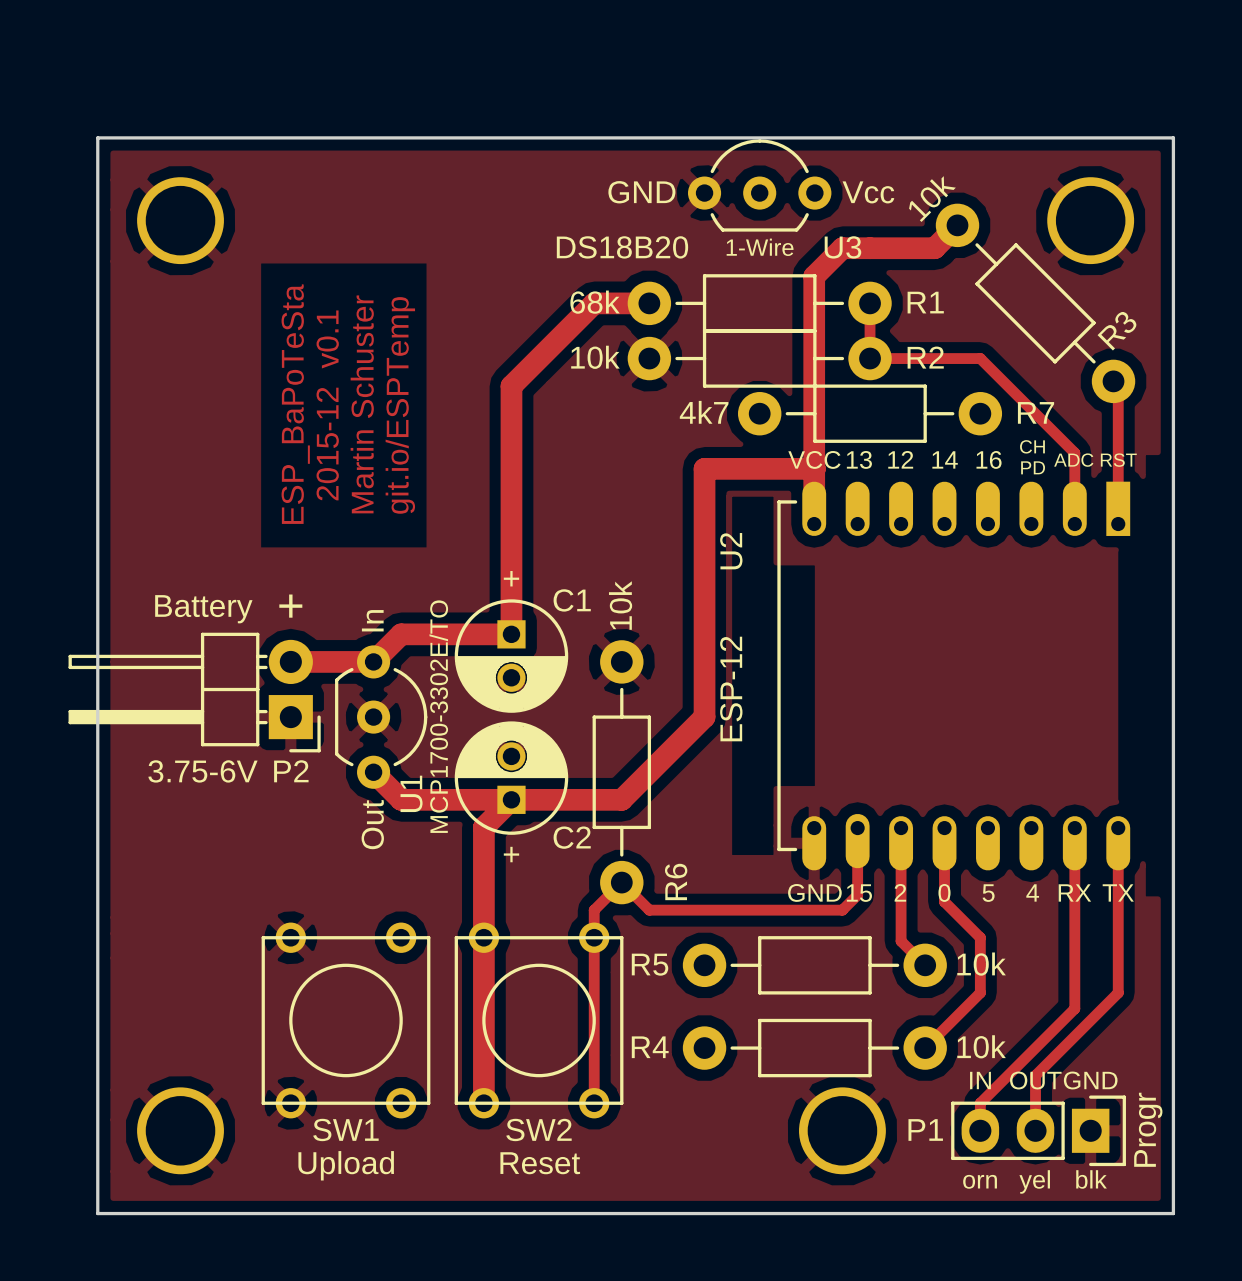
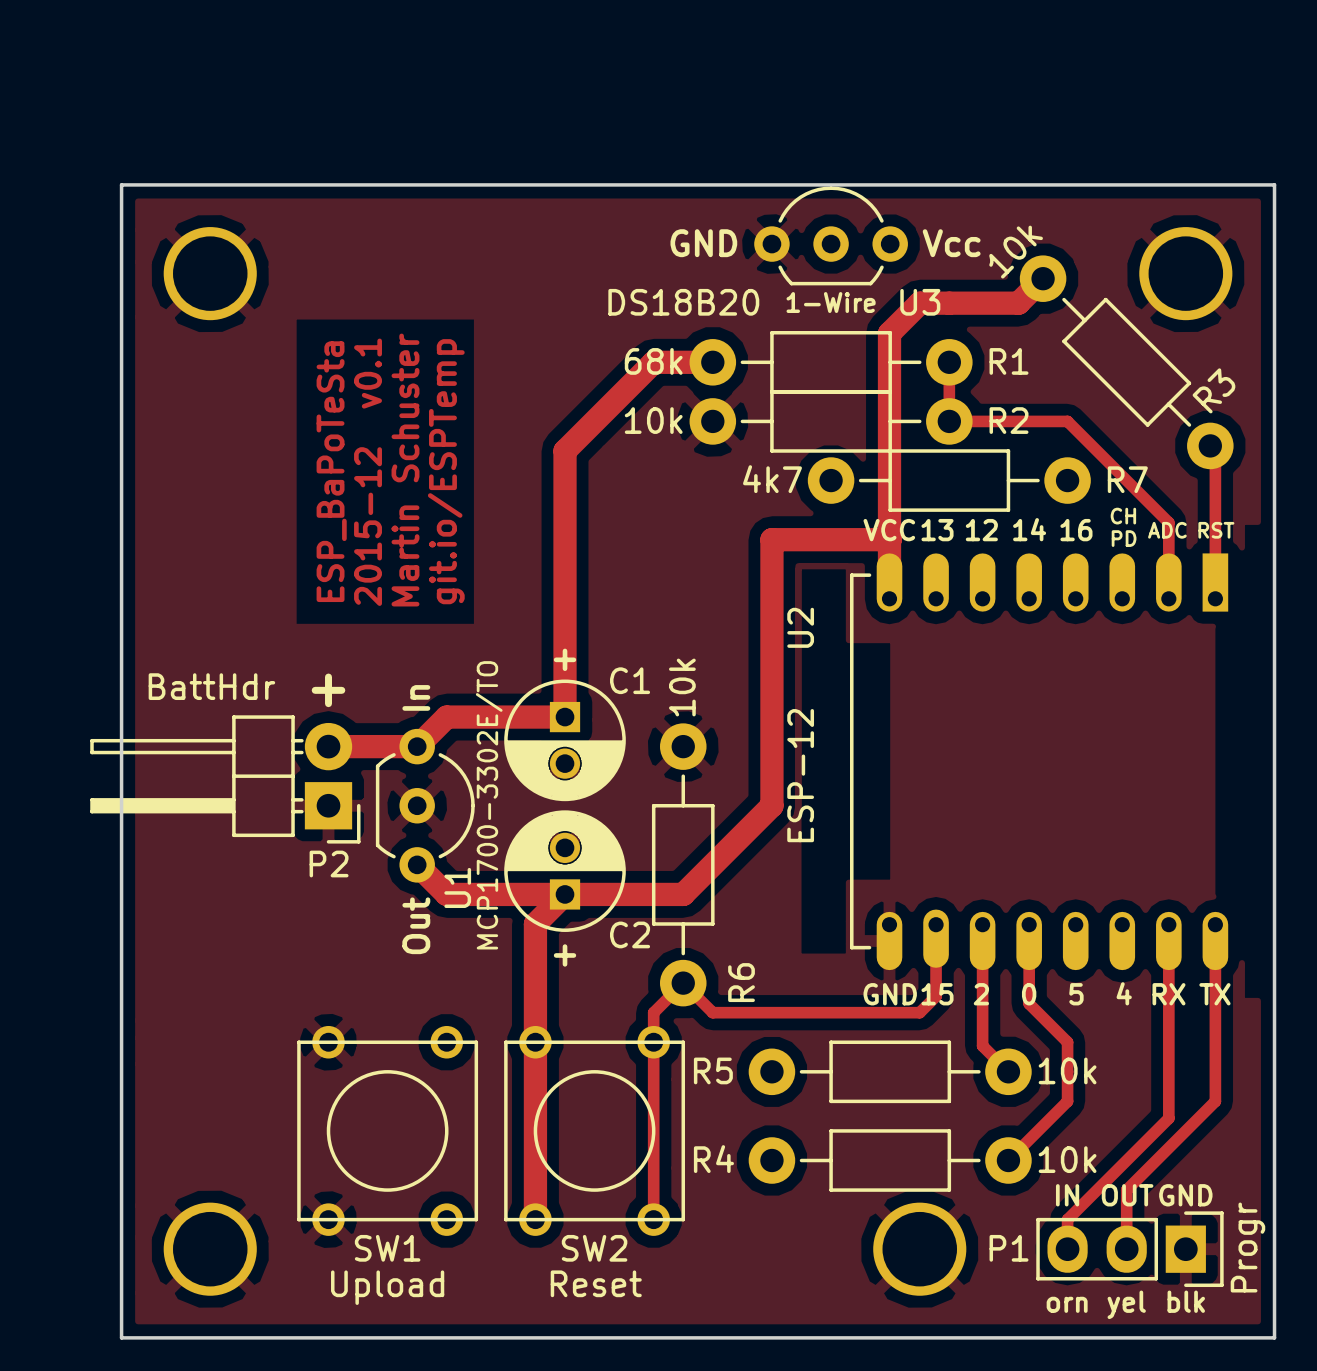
P2 value: Battery (203, 609) -> BattHdr (211, 686)
text: 3.75-6V (202, 771) -> none

